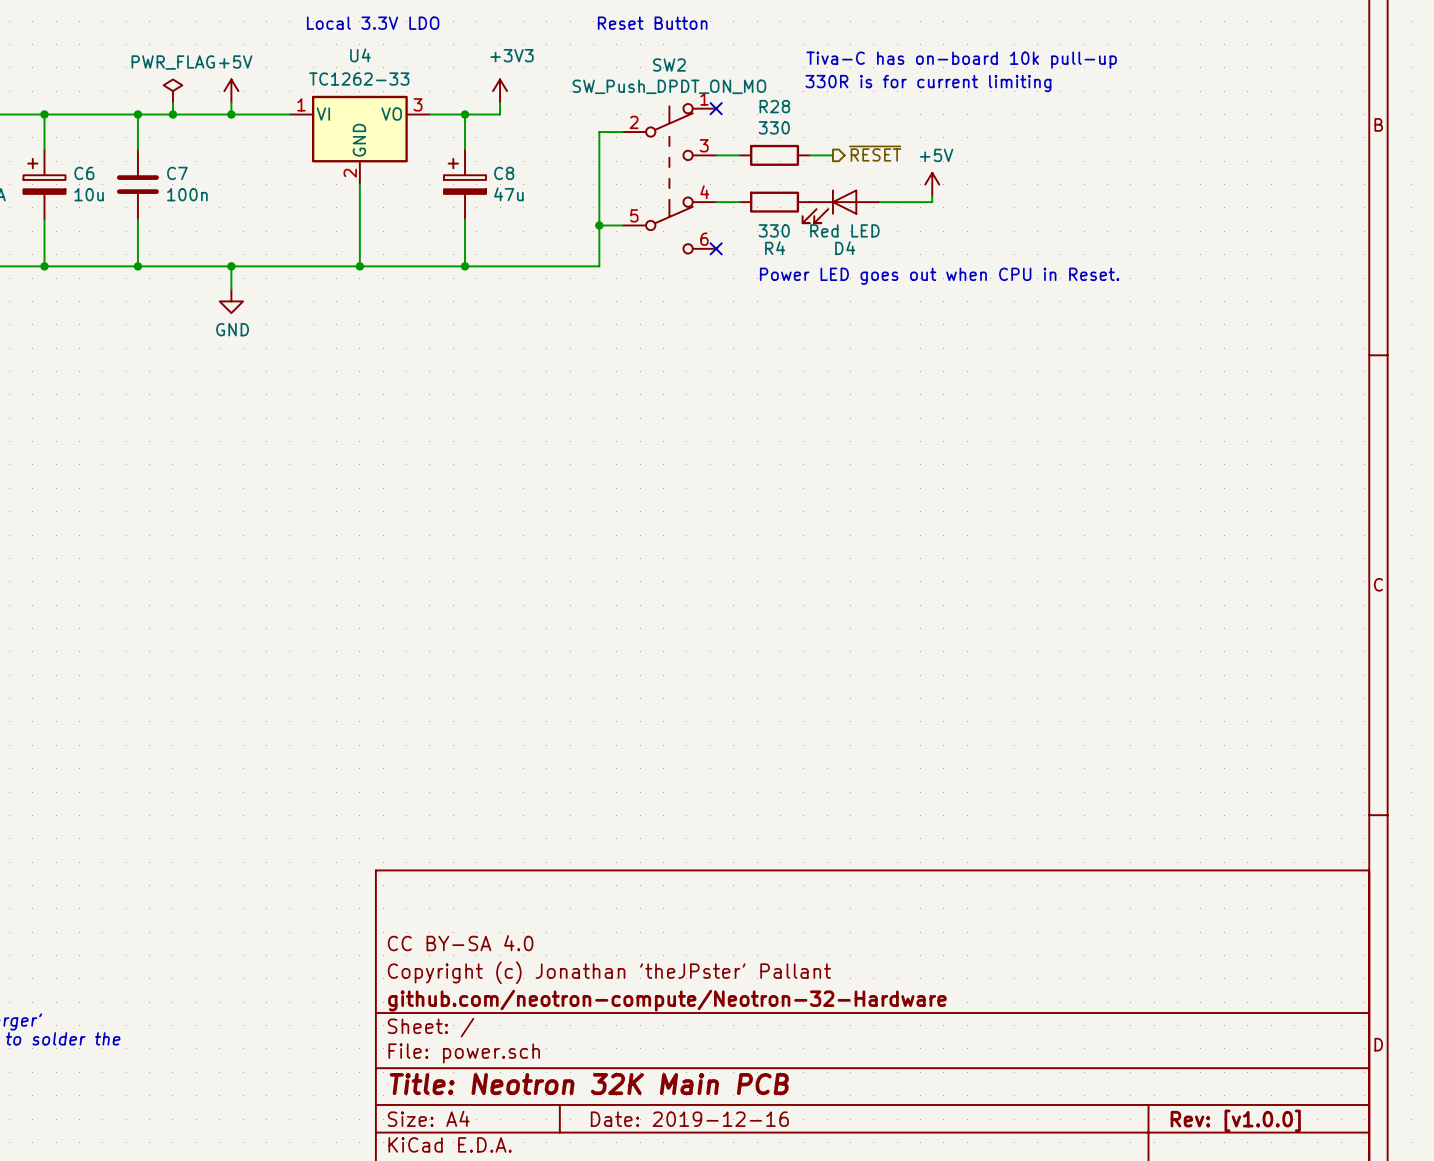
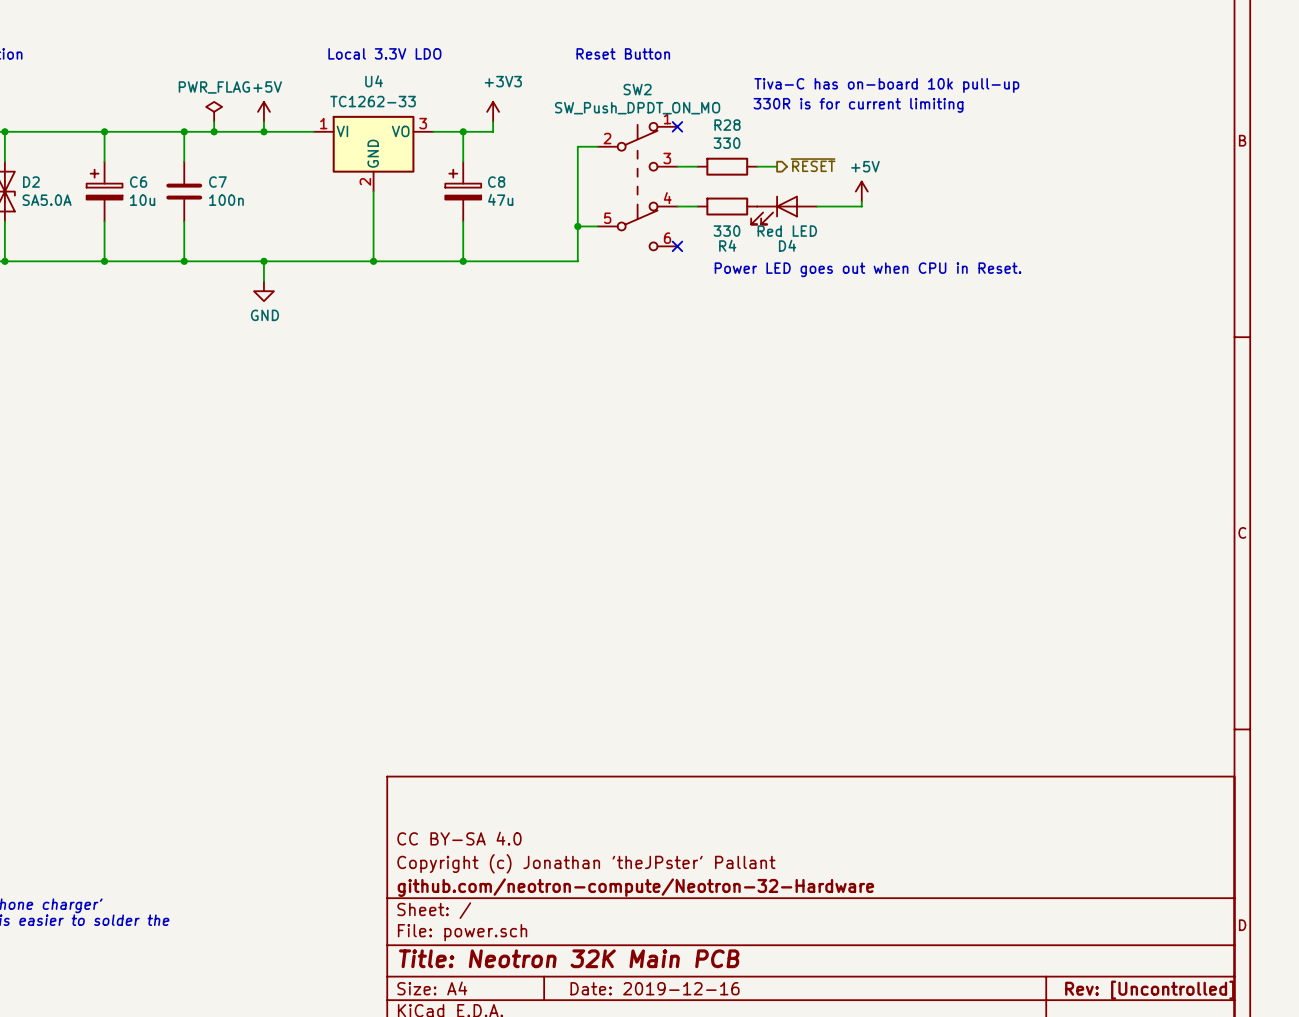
title block: Rev: [v1.0.0] (1235, 1120) -> Rev: [Uncontrolled] (1149, 990)

